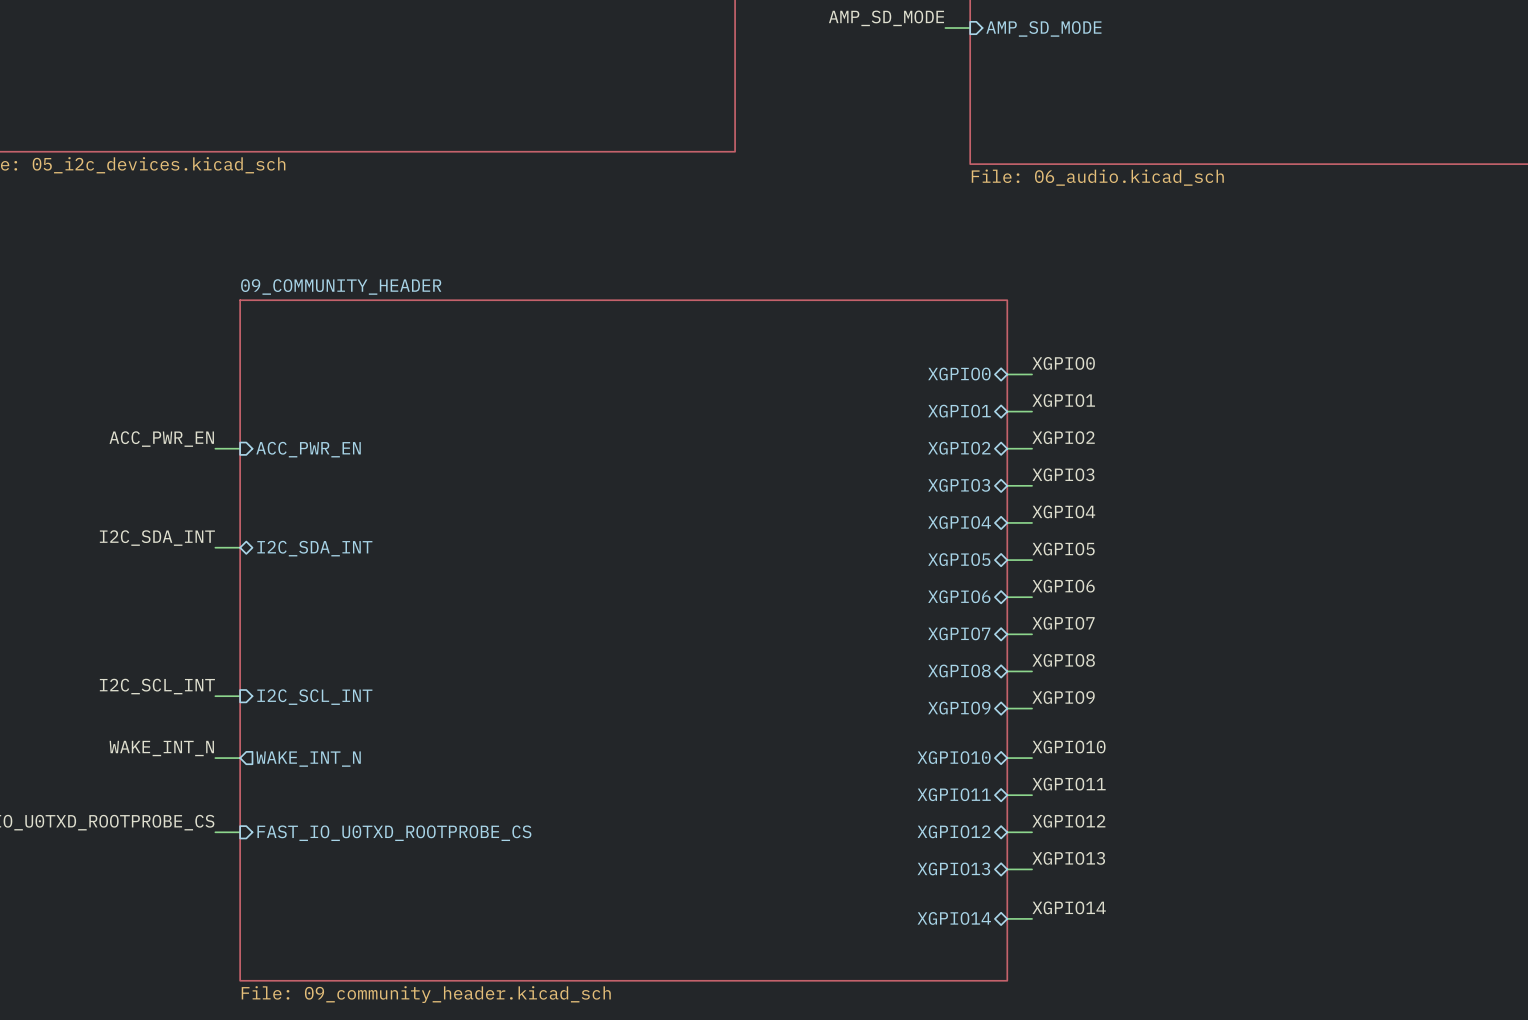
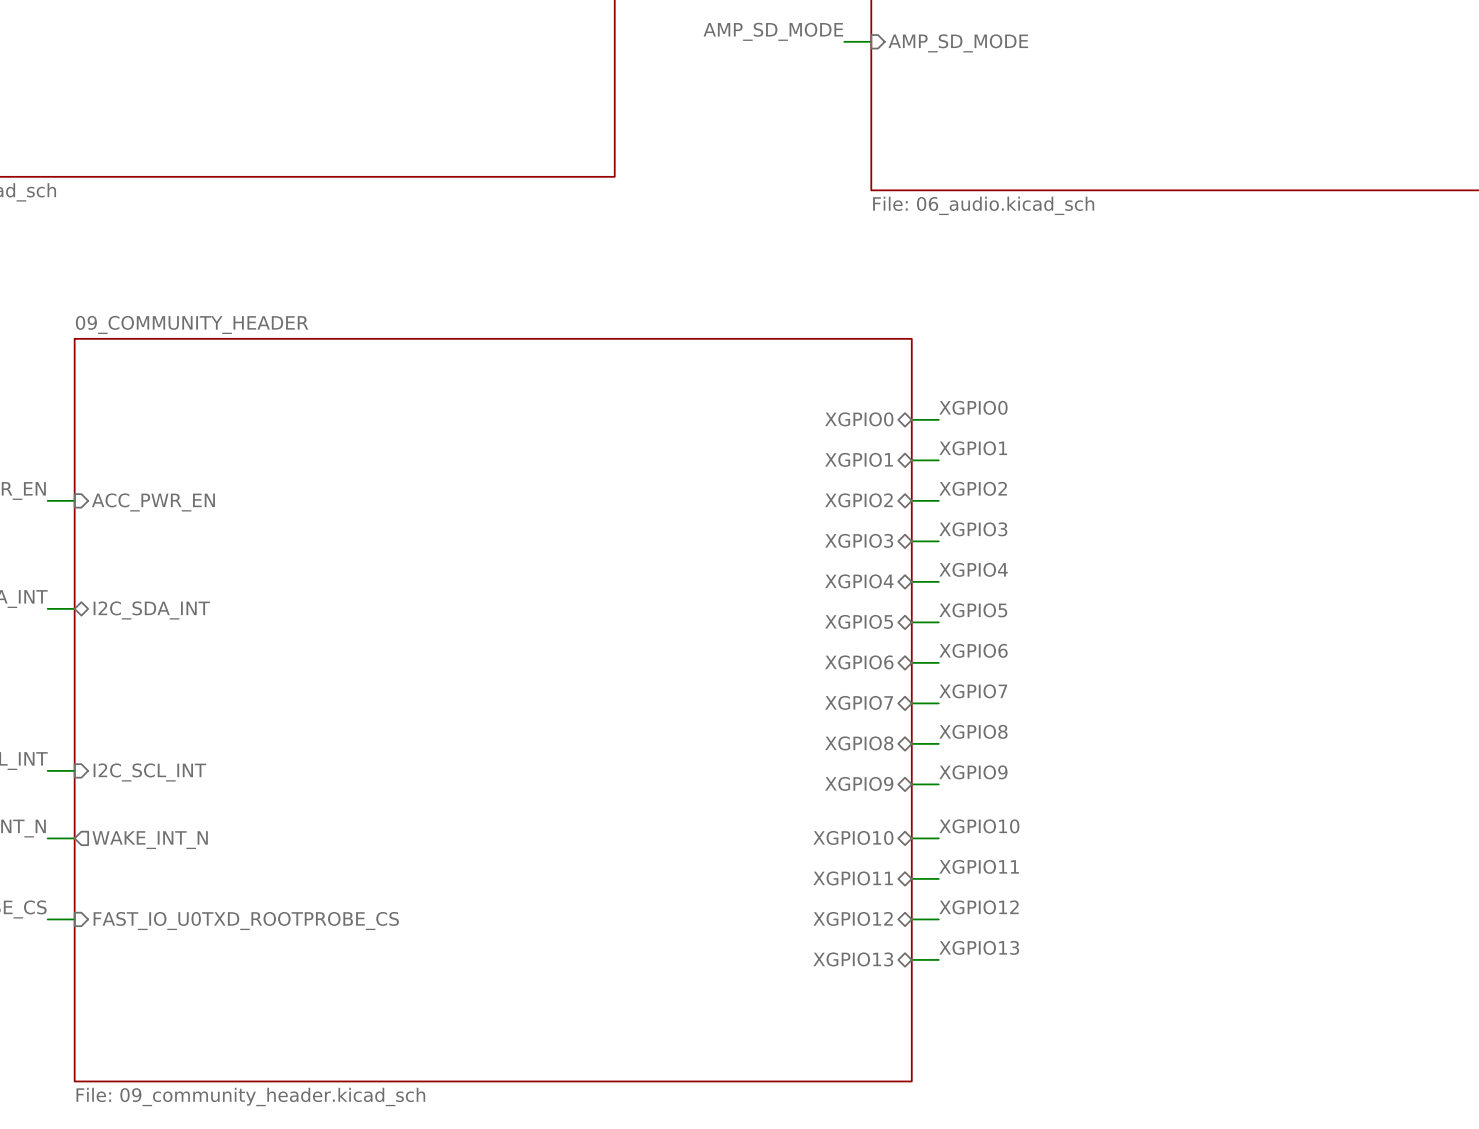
label: XGPIO14 (1069, 907) -> none
sheet pin: XGPIO14 (954, 918) -> none
wire: (1007, 918) (1032, 918) -> none

